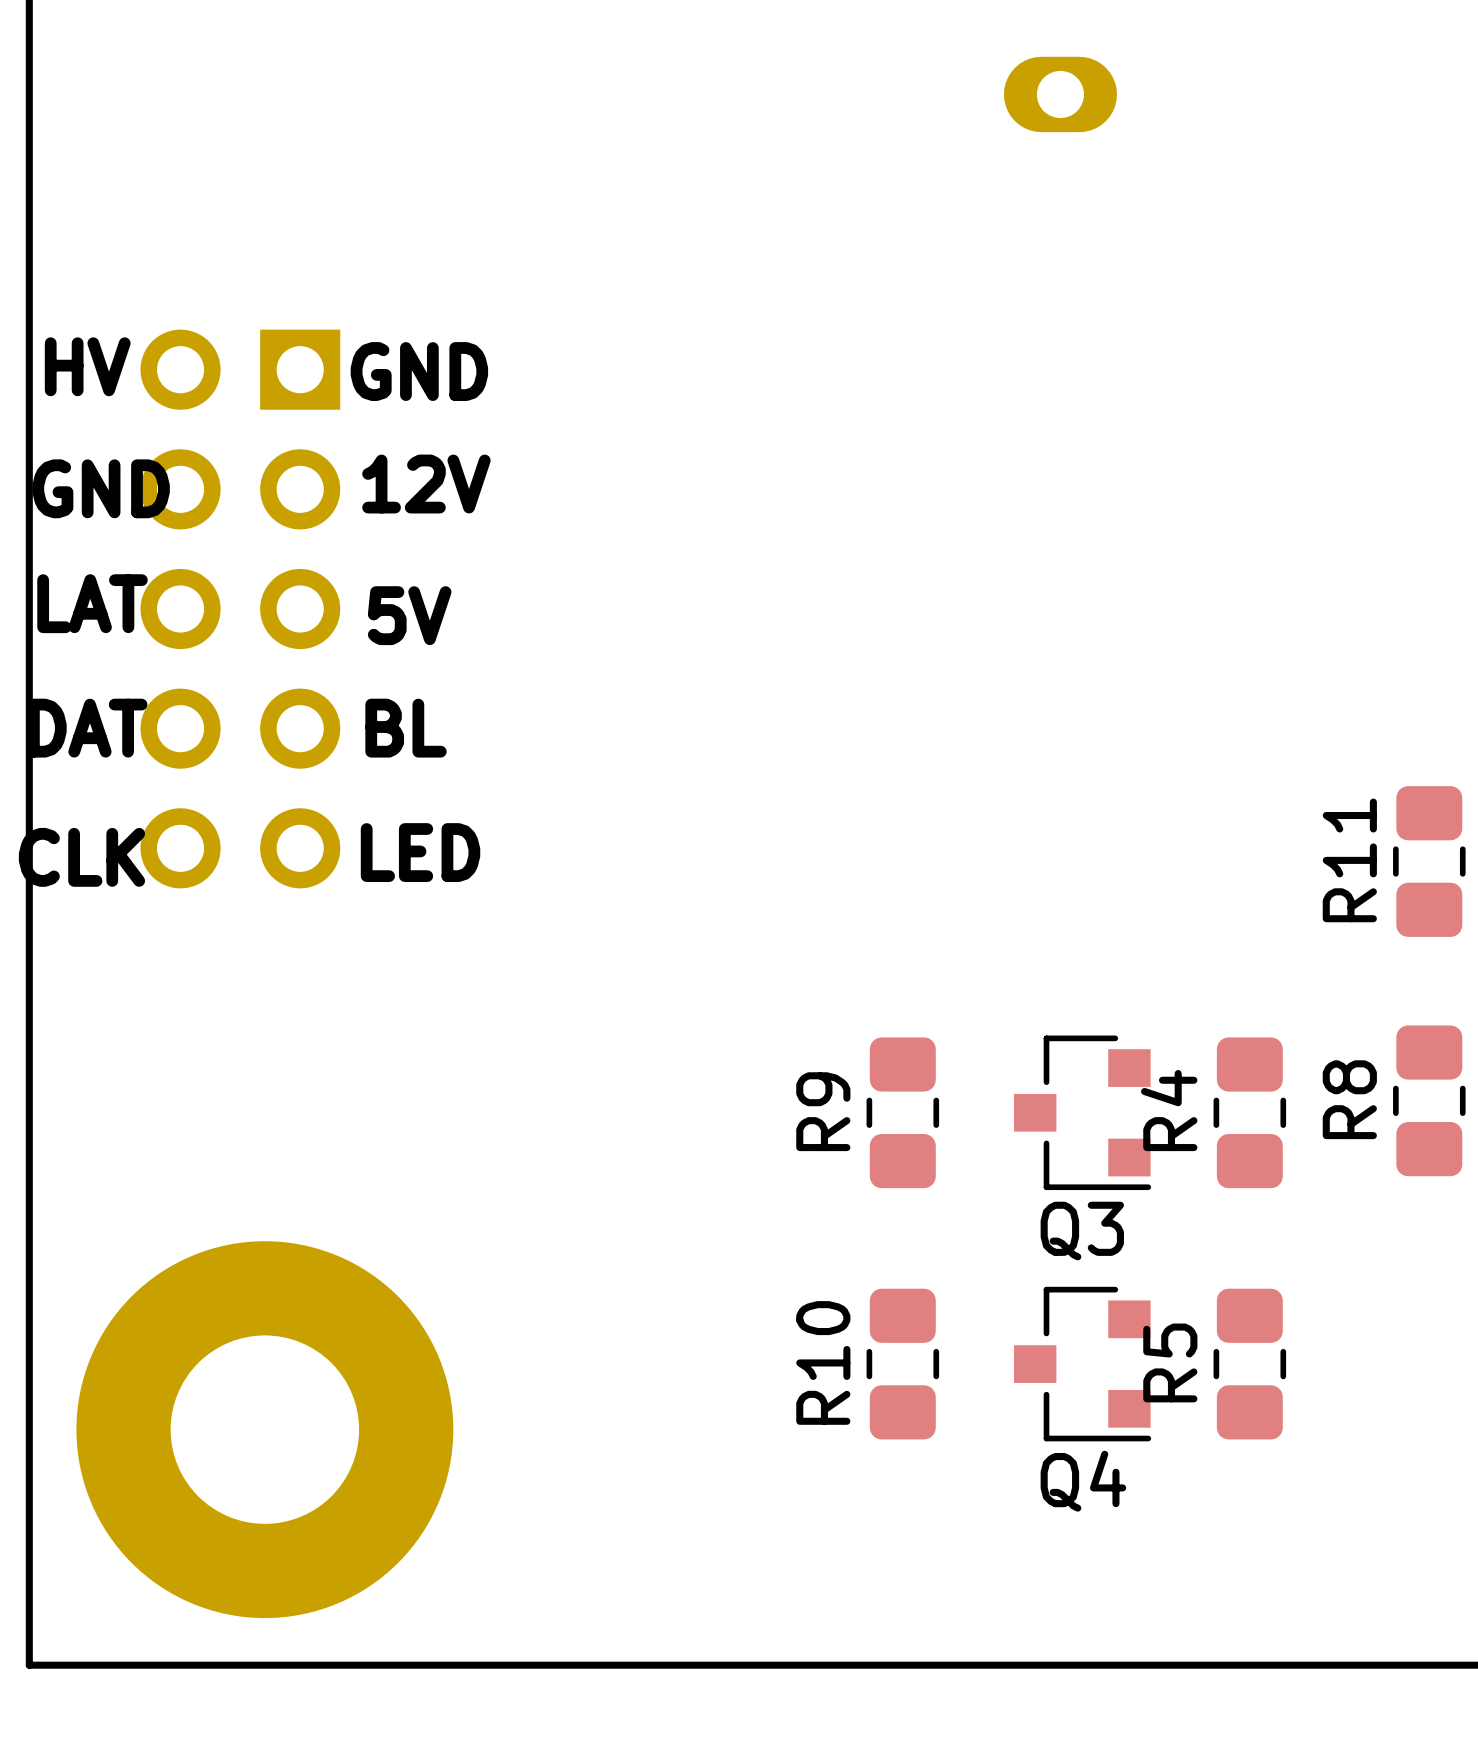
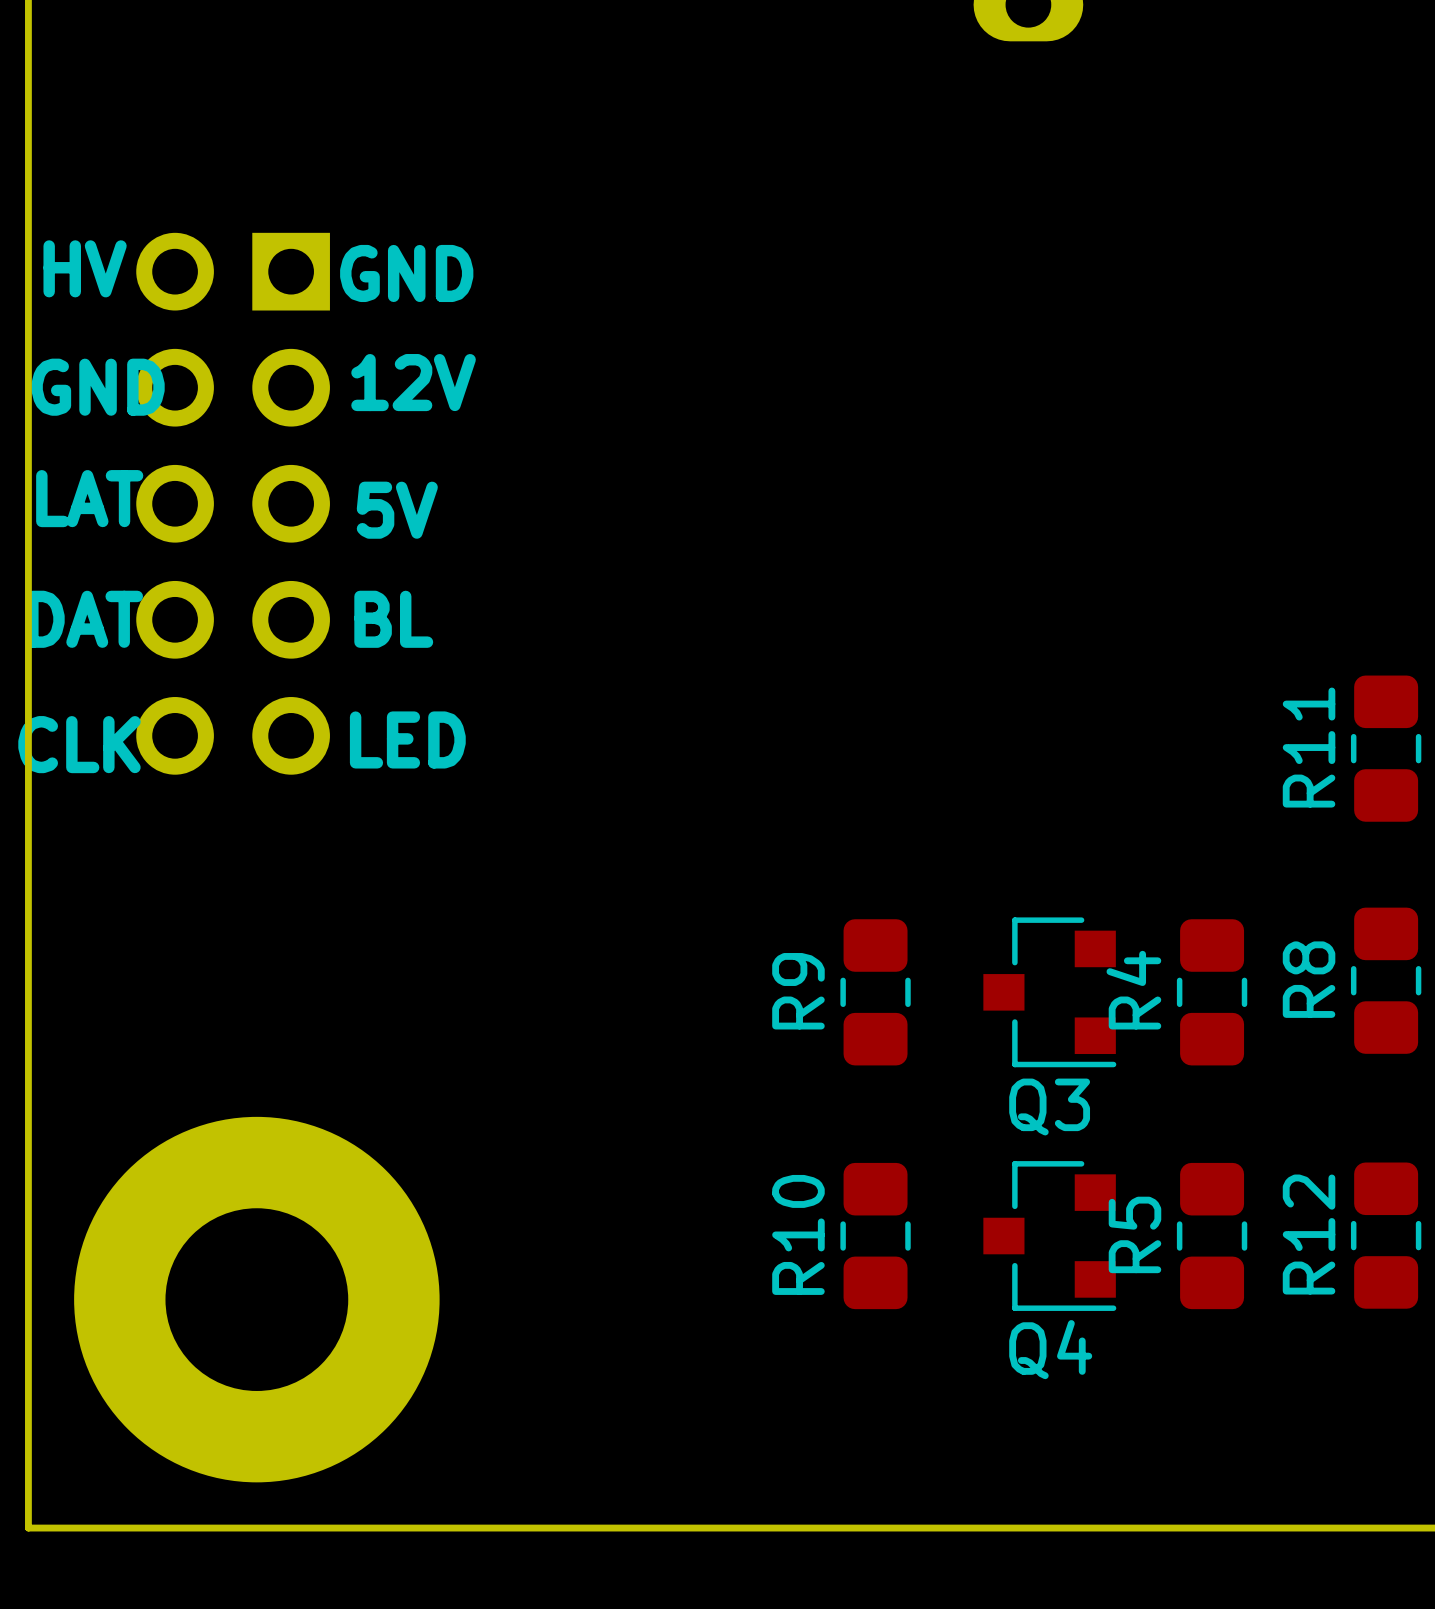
R12: none -> (1386, 1235)

